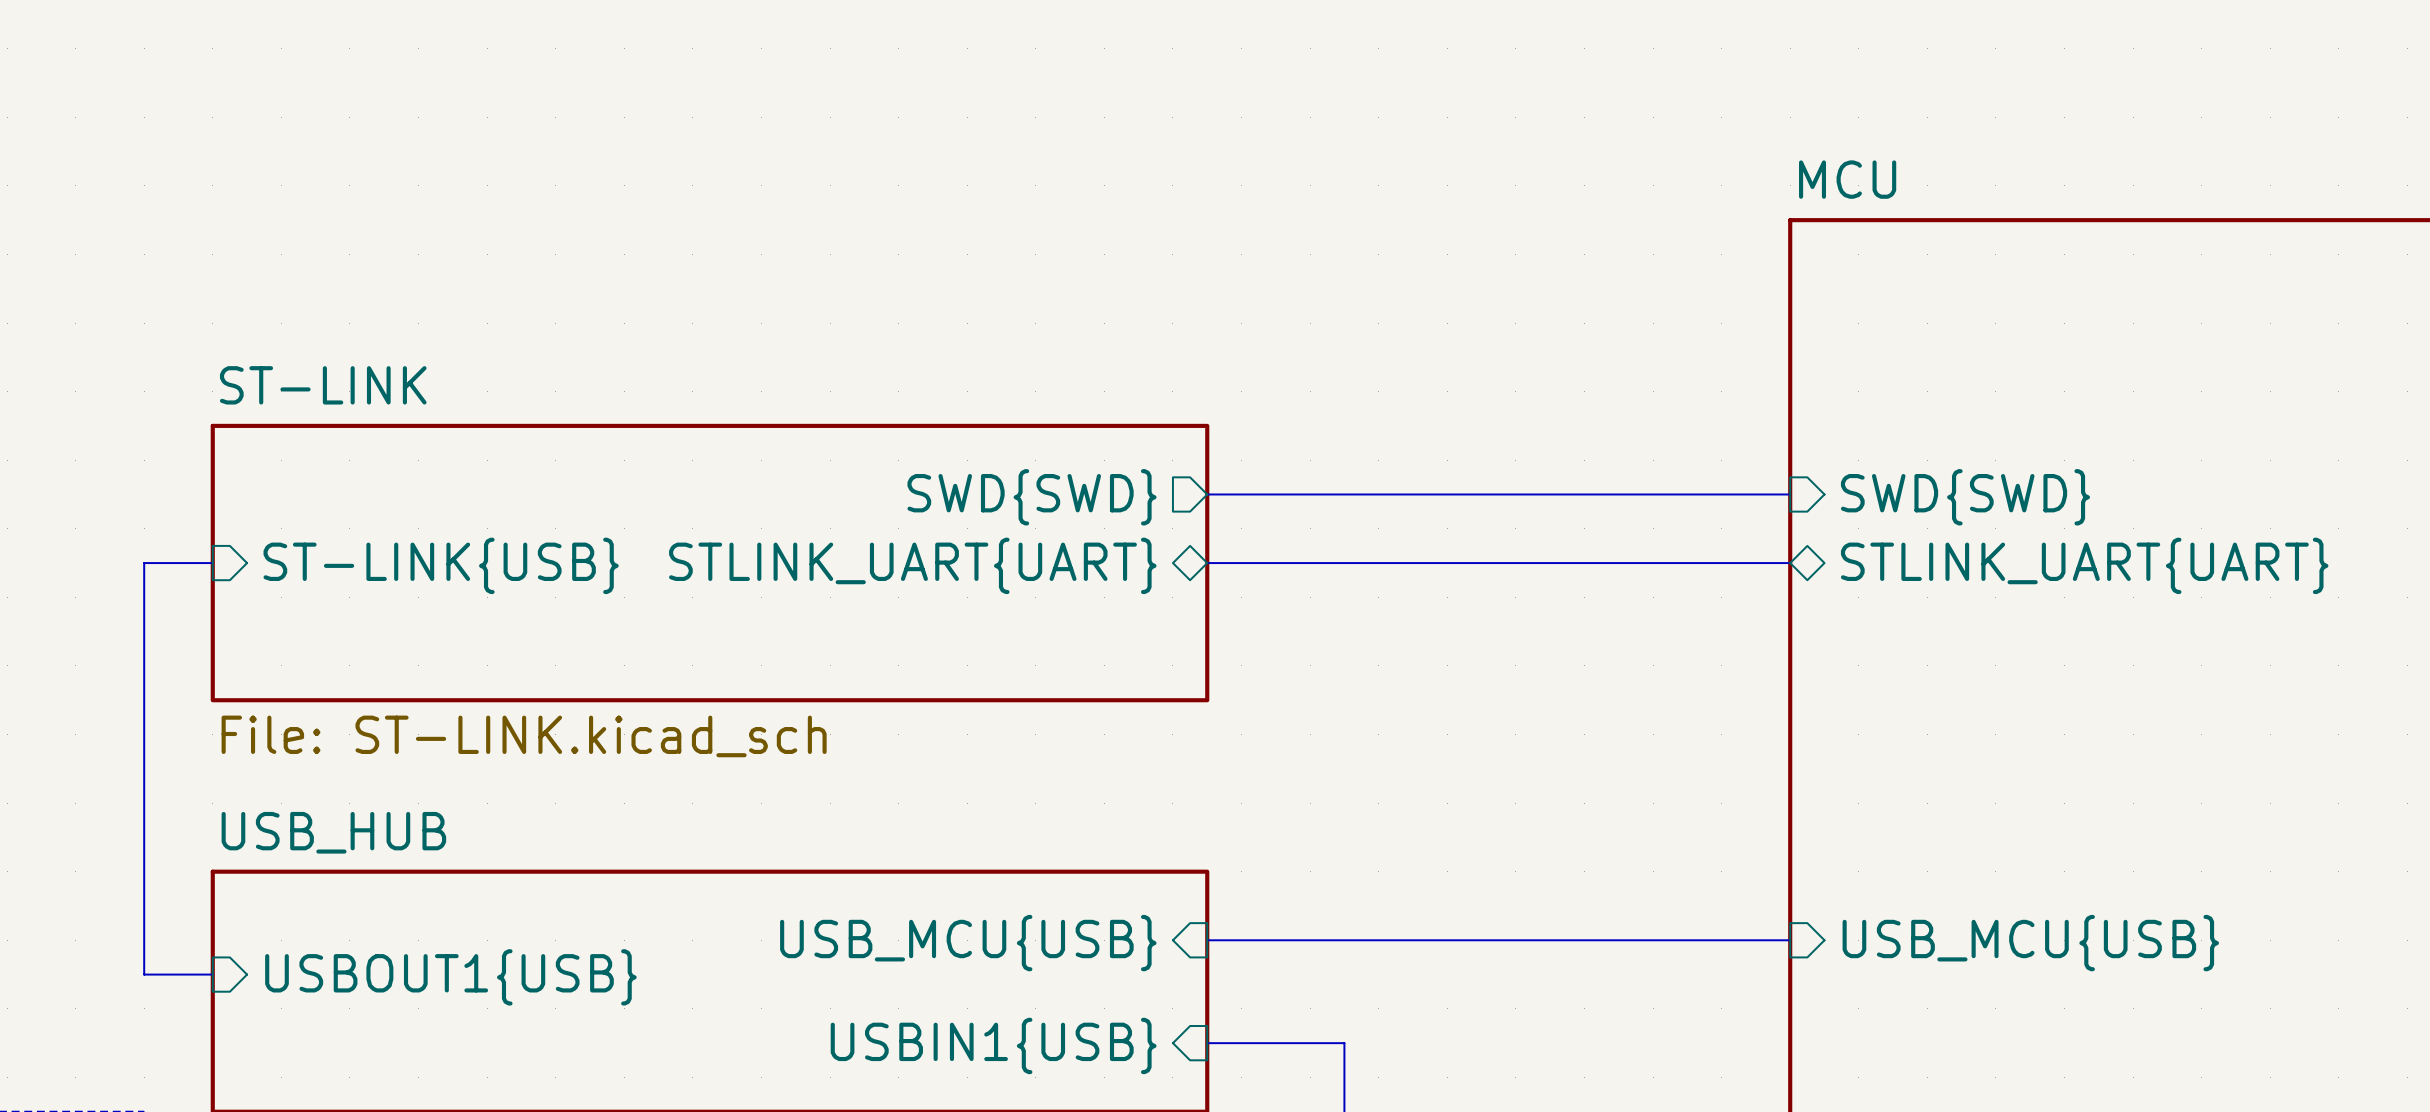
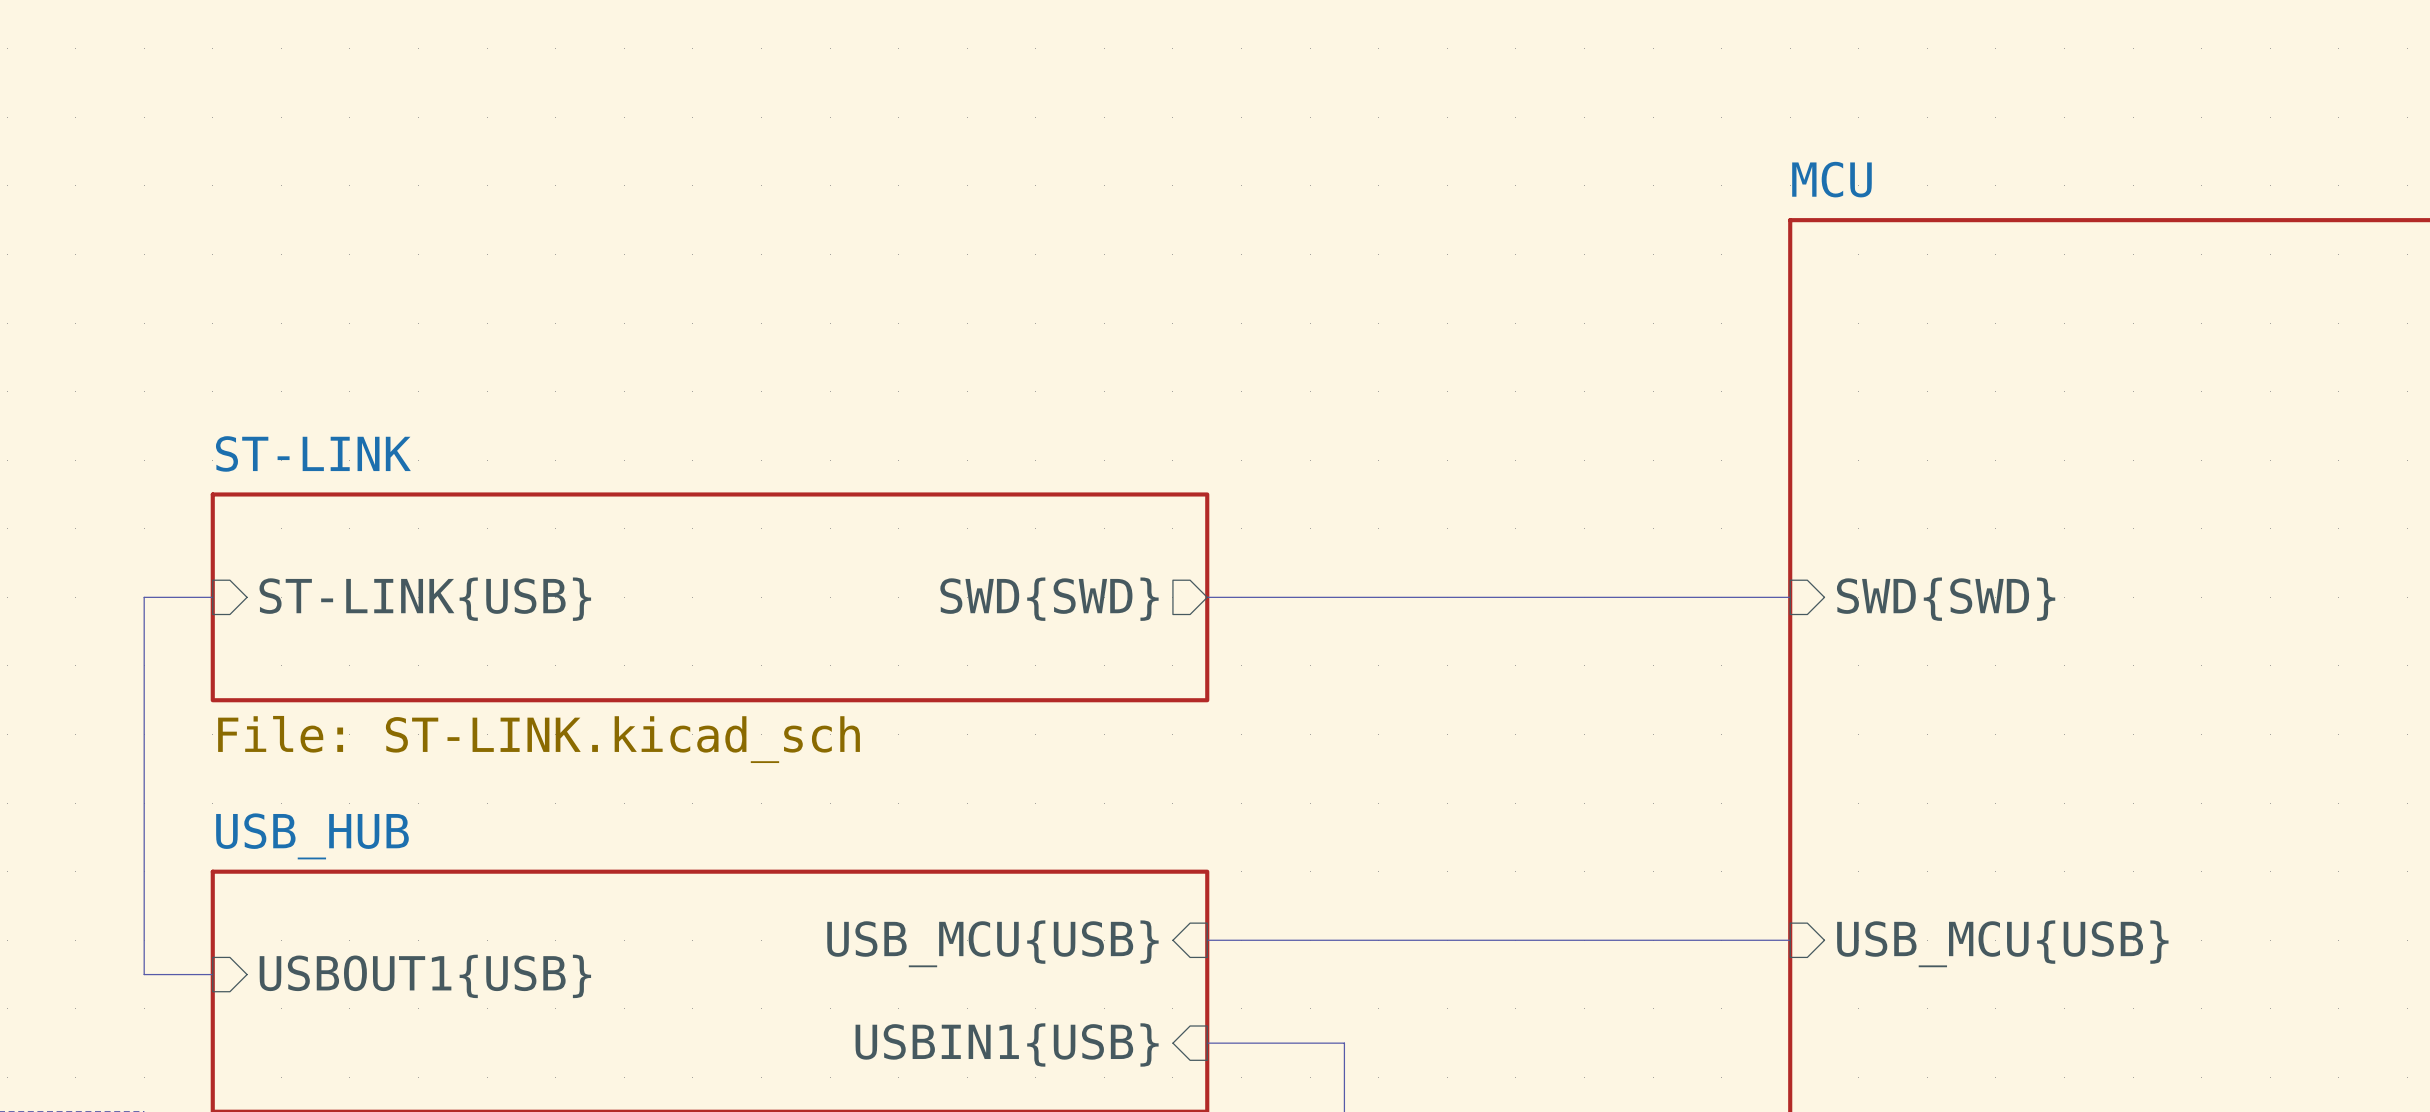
bus: (1207, 494) (1790, 494) -> none
sheet pin position: SWD{SWD} (1031, 497) -> SWD{SWD} (1049, 599)
sheet pin position: SWD{SWD} (1965, 497) -> SWD{SWD} (1946, 599)
bus: (212, 563) (144, 563) (144, 597) -> (212, 597) (144, 597)
sheet ST-LINK: File: ST-LINK.kicad_sch (710, 563) -> none
bus: (1207, 563) (1790, 563) -> (1207, 597) (1790, 597)
sheet pin position: ST-LINK{USB} (441, 565) -> ST-LINK{USB} (425, 599)
sheet pin: STLINK_UART{UART} (912, 565) -> none
sheet pin: STLINK_UART{UART} (2084, 565) -> none
sheet ST-LINK: none -> File: ST-LINK.kicad_sch (710, 597)

